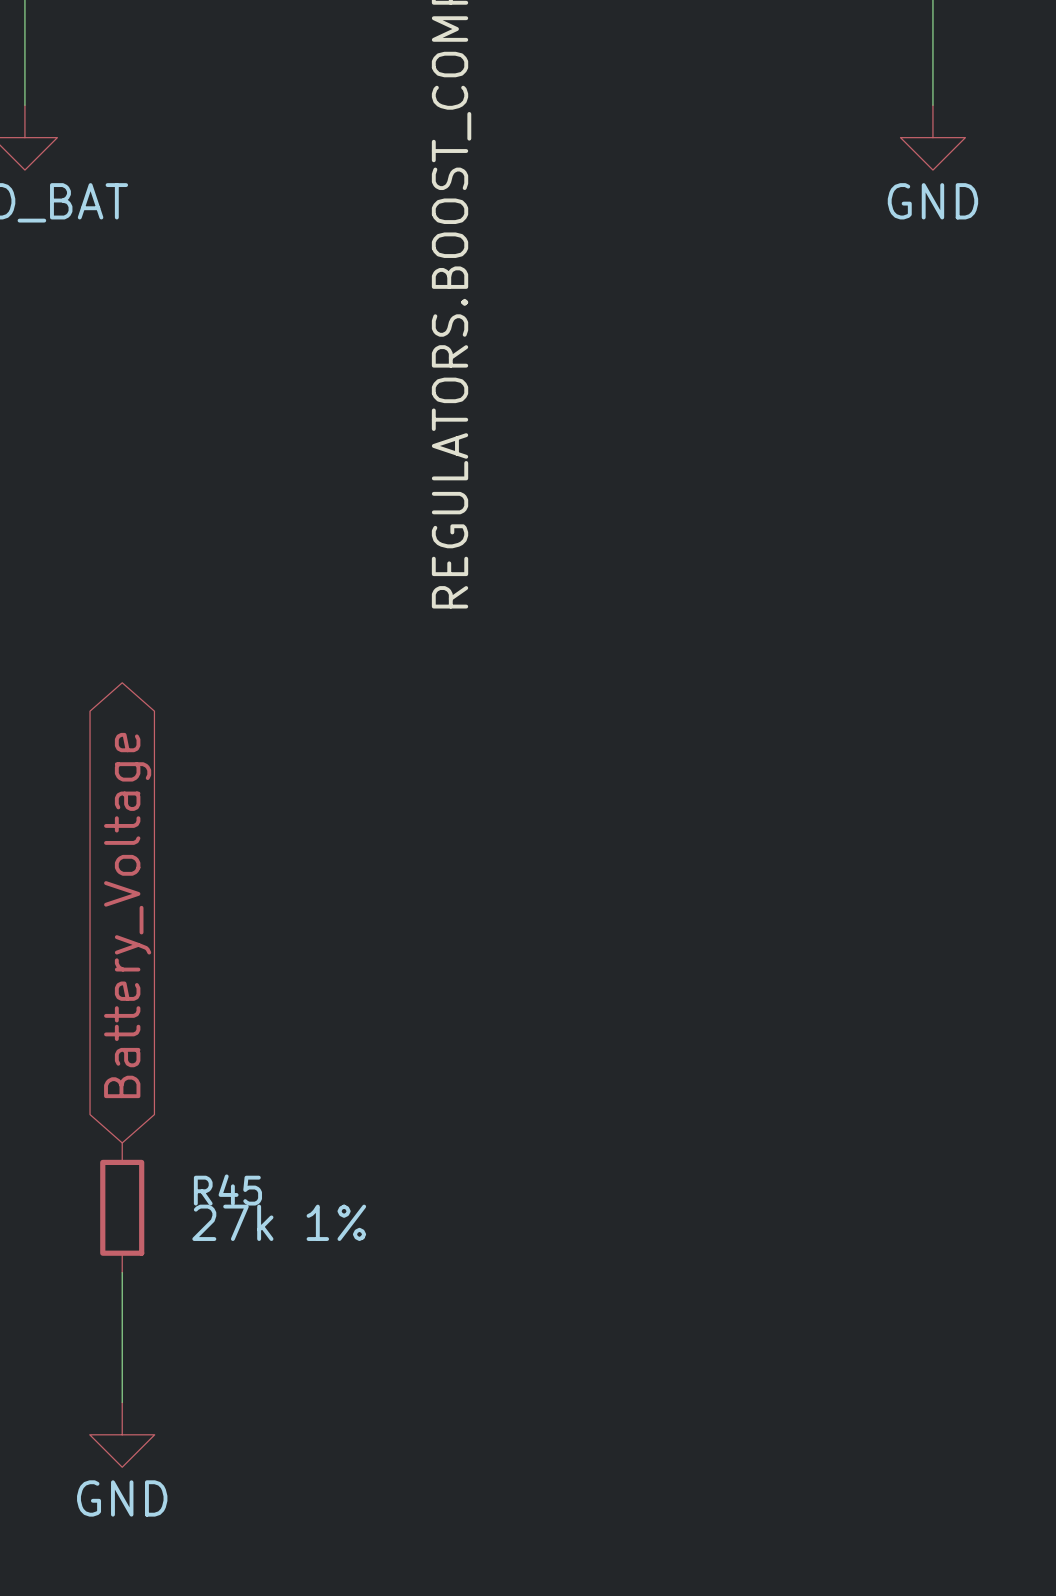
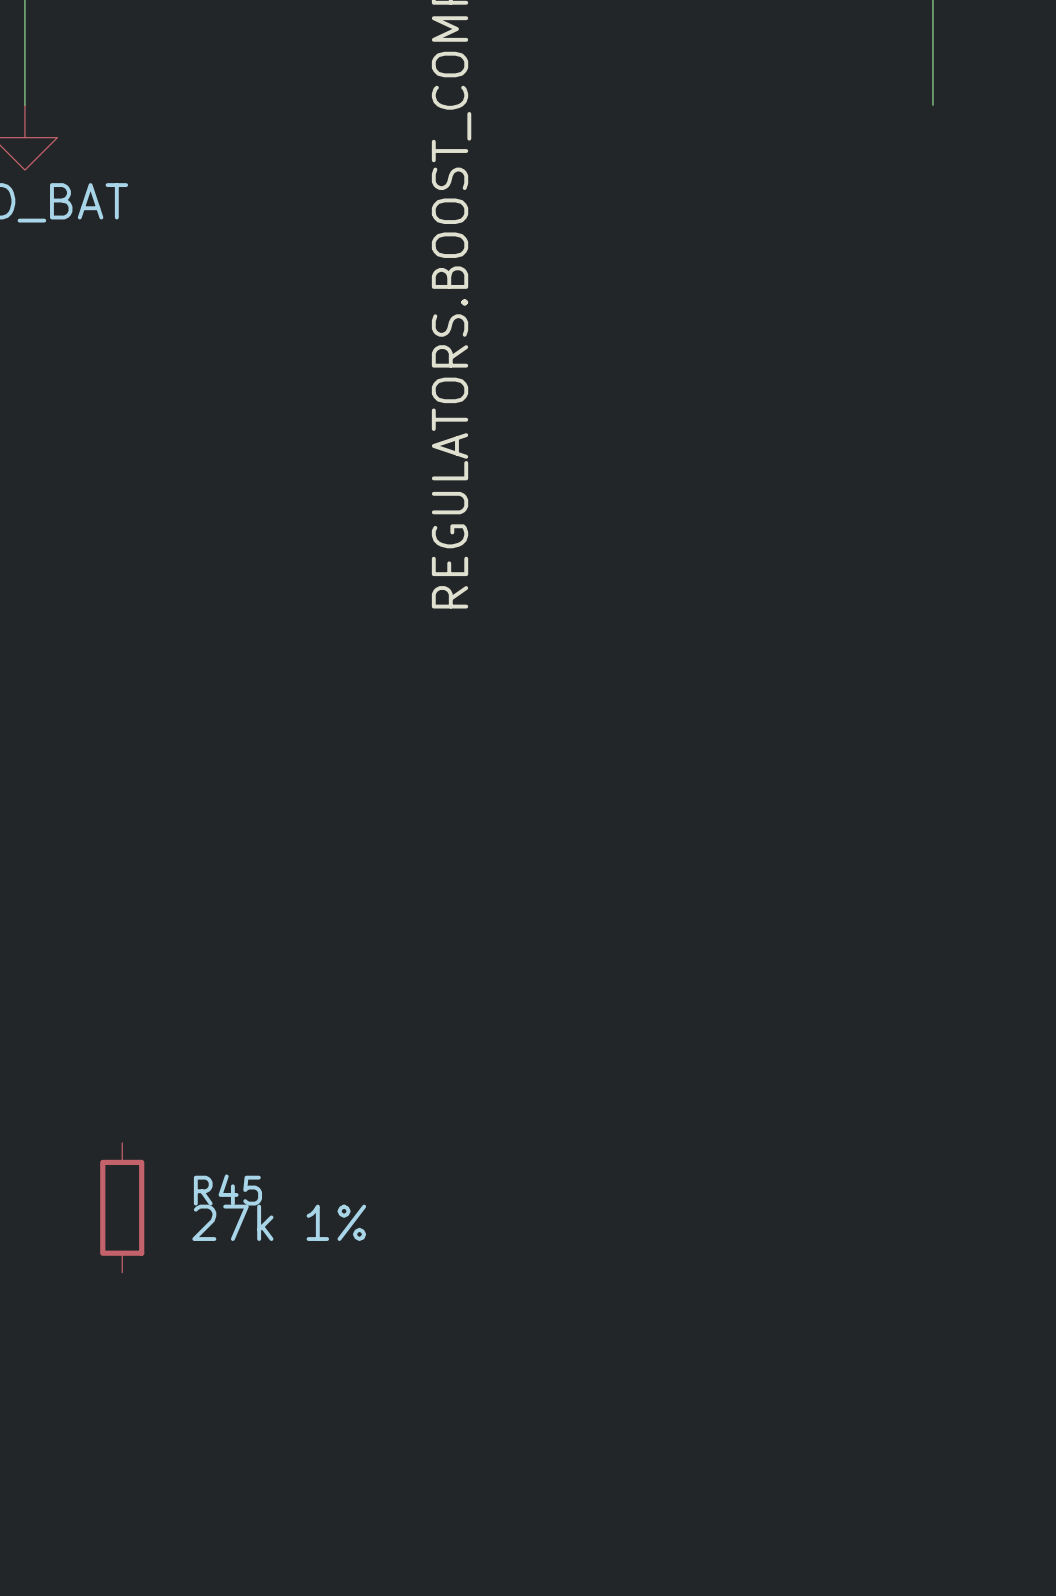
power symbol: GND (932, 137) -> none
global label: Battery_Voltage (127, 915) -> none
wire: (122, 1272) (122, 1402) -> none
power symbol: GND (122, 1434) -> none

